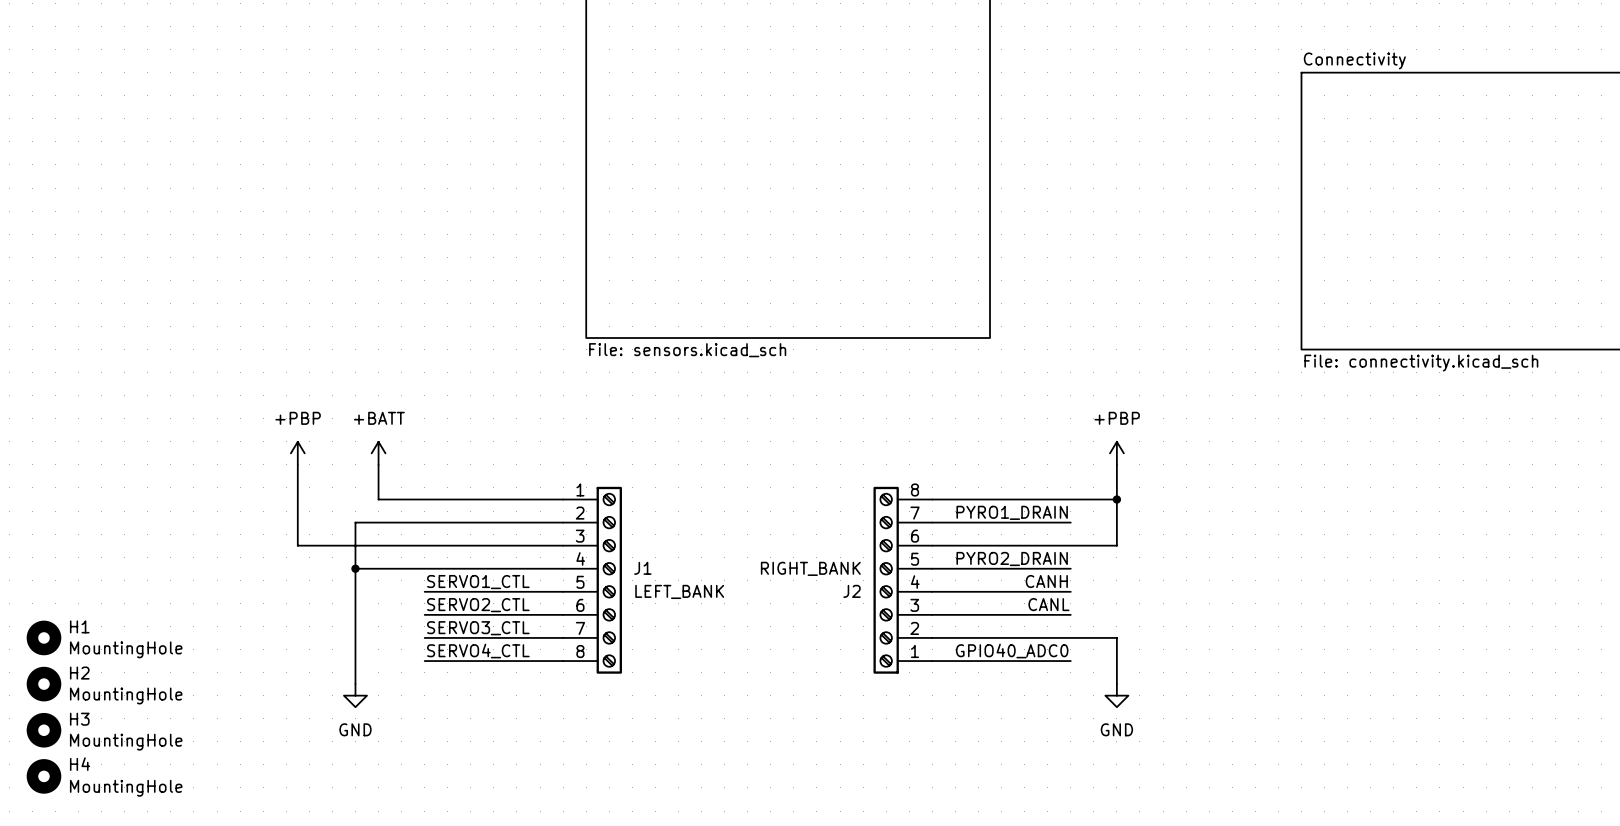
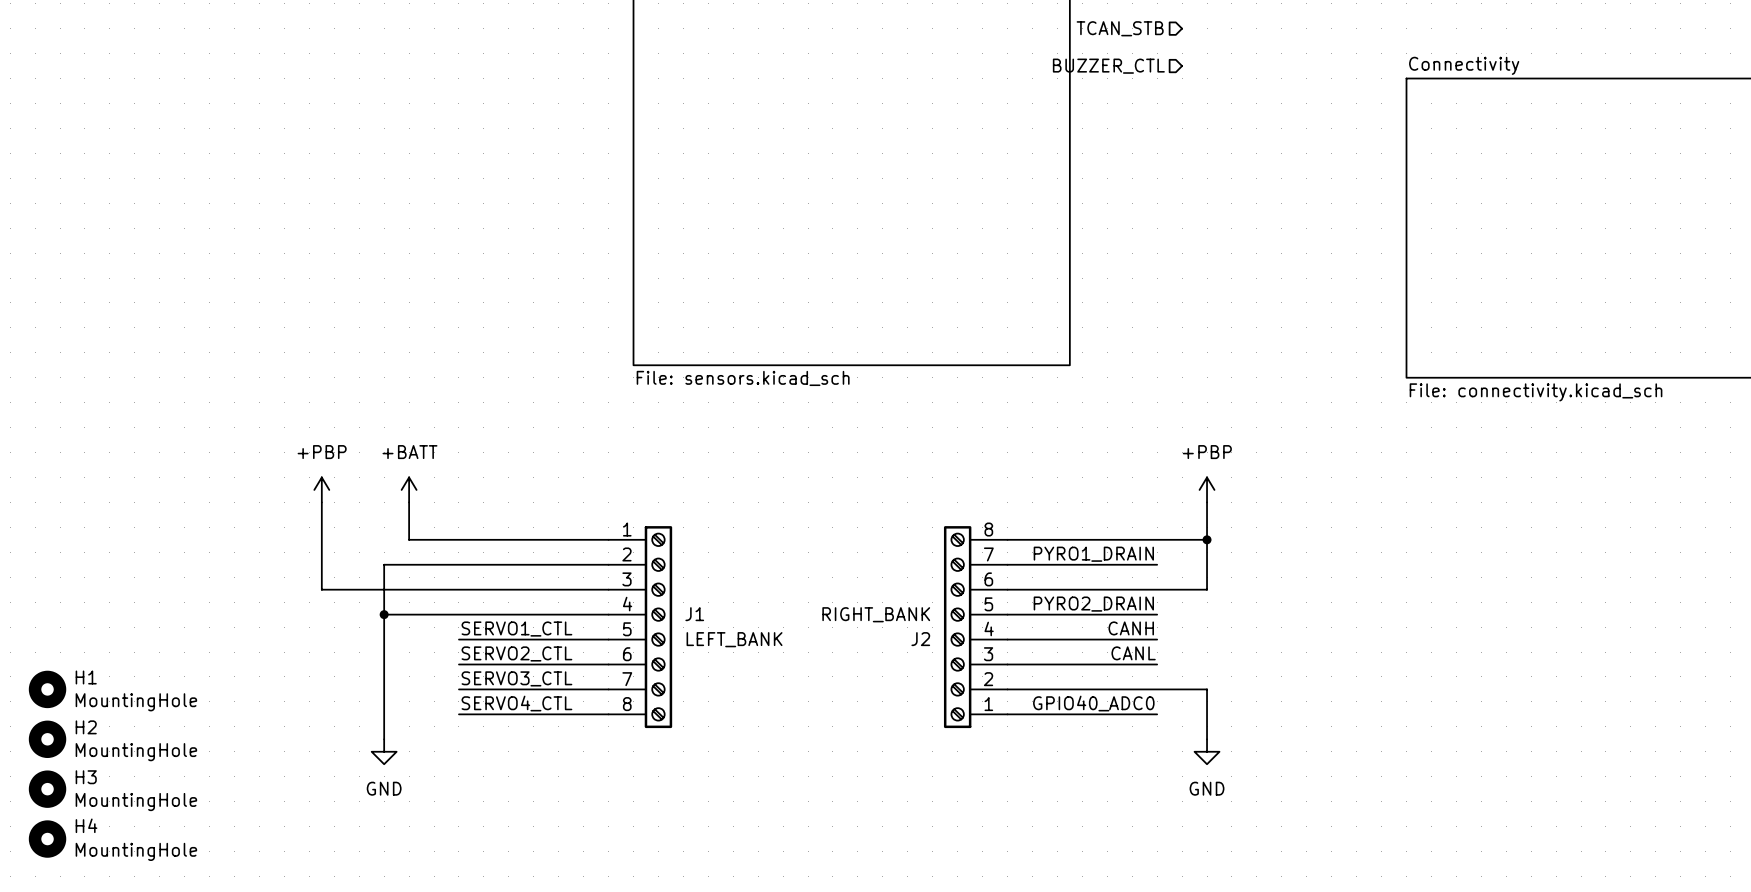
sheet pin: none -> TCAN_STB (1120, 28)
sheet pin: none -> BUZZER_CTL (1108, 66)

